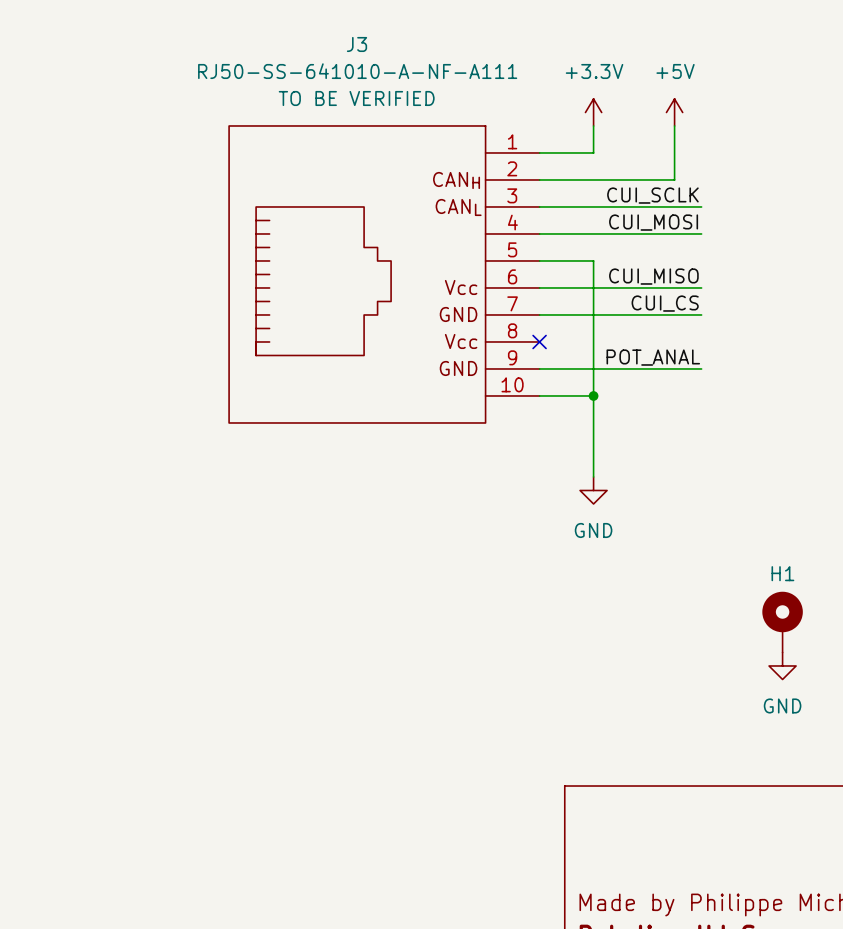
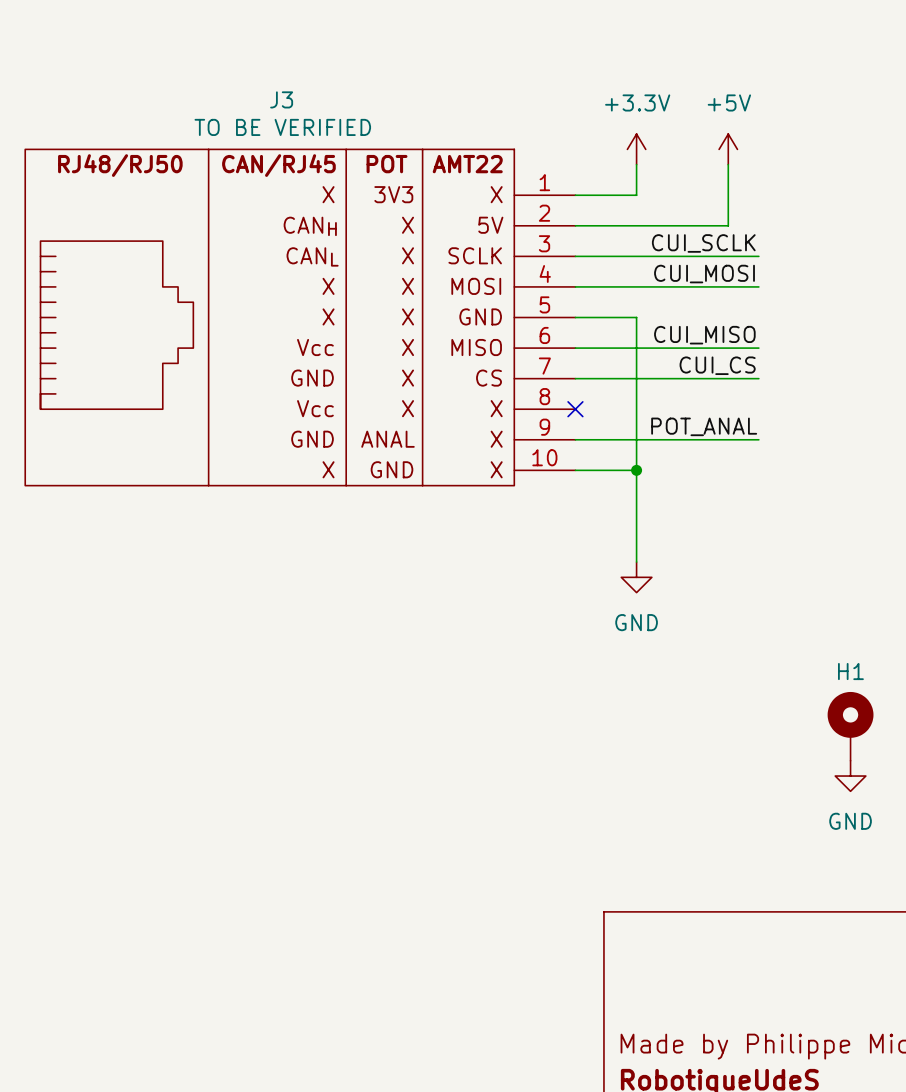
J3 name position: J3 (357, 44) -> J3 (281, 99)
J3 value: RJ50-SS-641010-A-NF-A111 (357, 71) -> none
J3 symbol: [229, 125, 540, 423] -> [25, 149, 576, 486]

